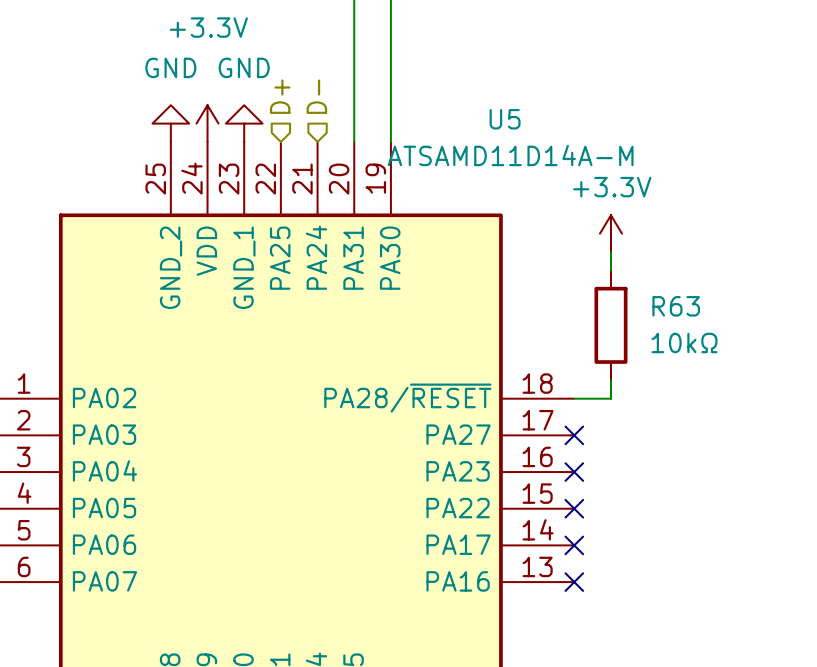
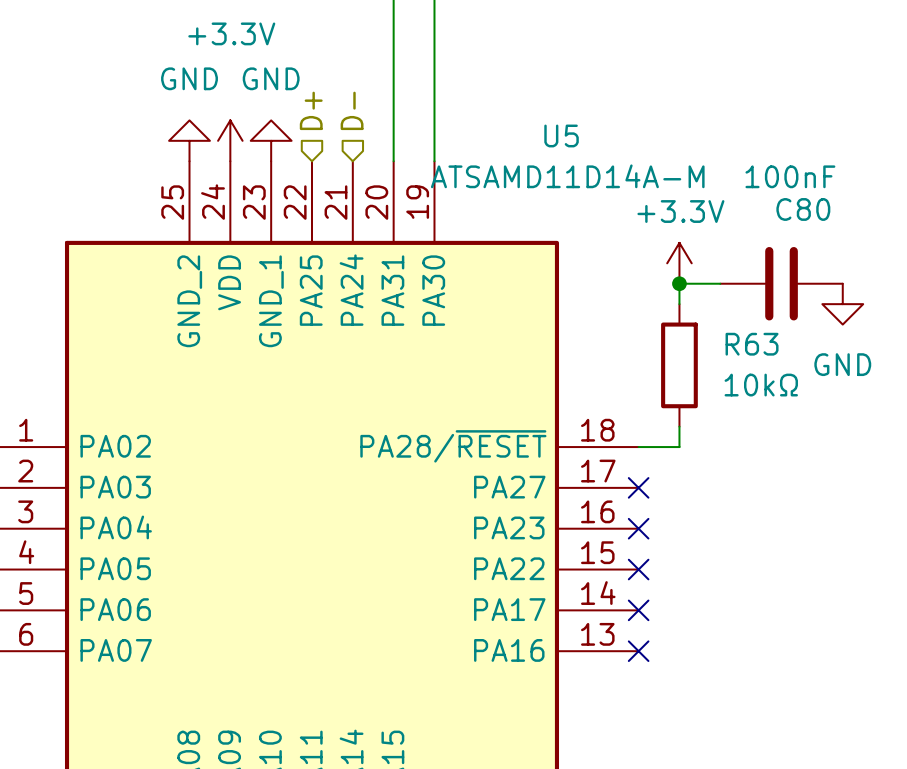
wire: none -> (679, 283) (720, 283)
junction: none -> (679, 283)
C80: none -> 100nF (781, 283)
power symbol: none -> GND (842, 304)

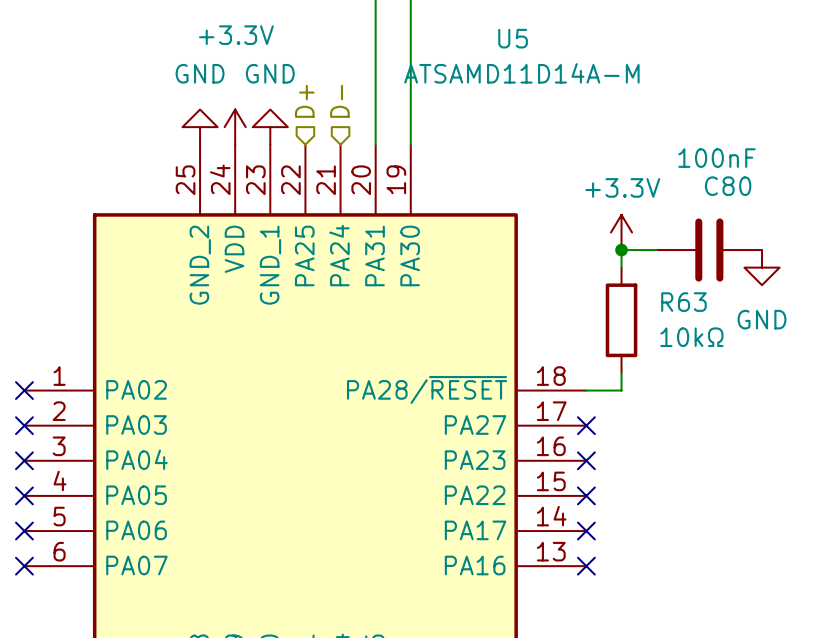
U5 name position: U5 (561, 135) -> U5 (513, 38)
U5 value position: ATSAMD11D14A-M (567, 176) -> ATSAMD11D14A-M (521, 73)

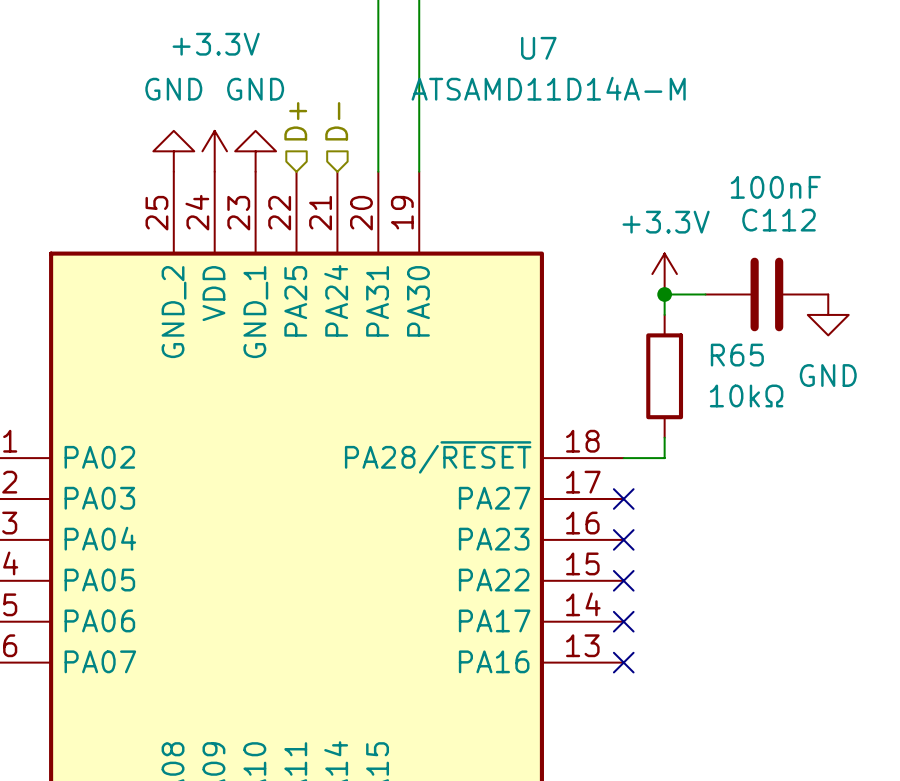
U5 name: U5 (513, 38) -> U7 (538, 48)
C80 name: C80 (728, 186) -> C112 (779, 220)
R63 name: R63 (683, 302) -> R65 (737, 355)

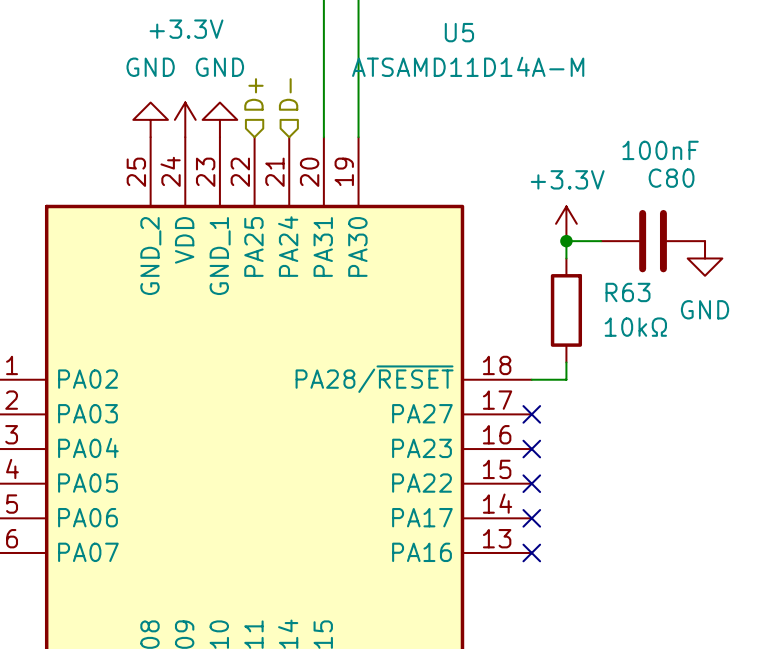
U7 name: U7 (538, 48) -> U5 (459, 32)
C112 name: C112 (779, 220) -> C80 (671, 178)
R65 name: R65 (737, 355) -> R63 (628, 292)

